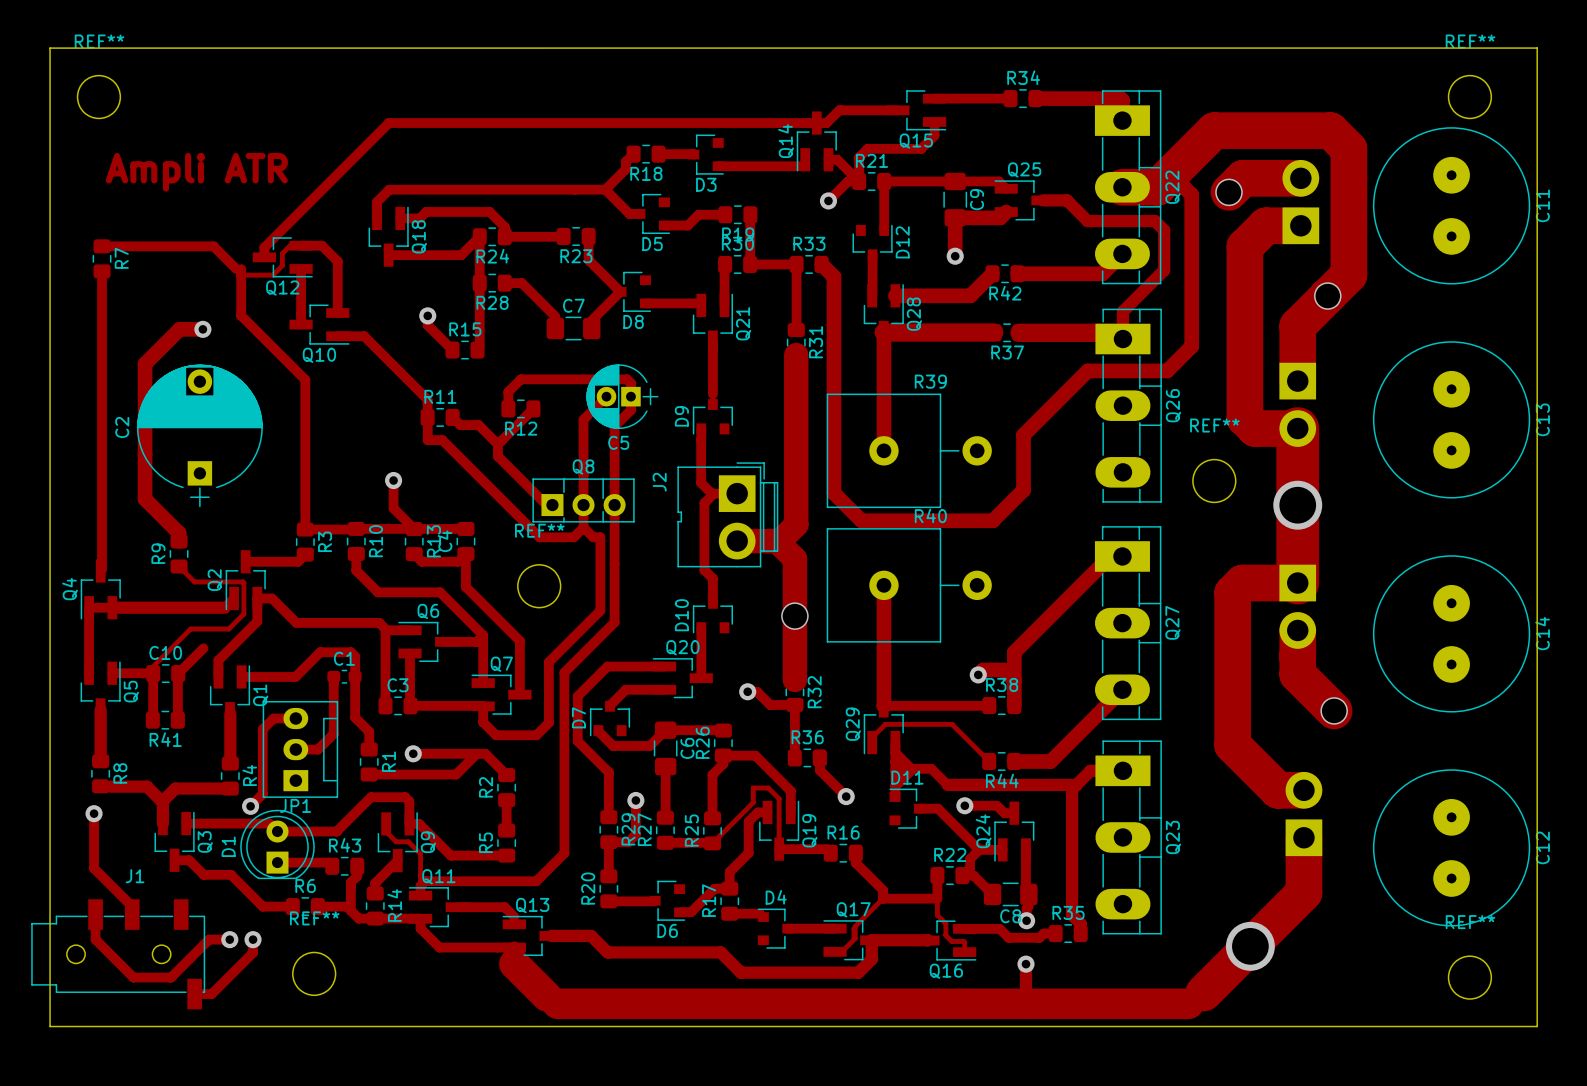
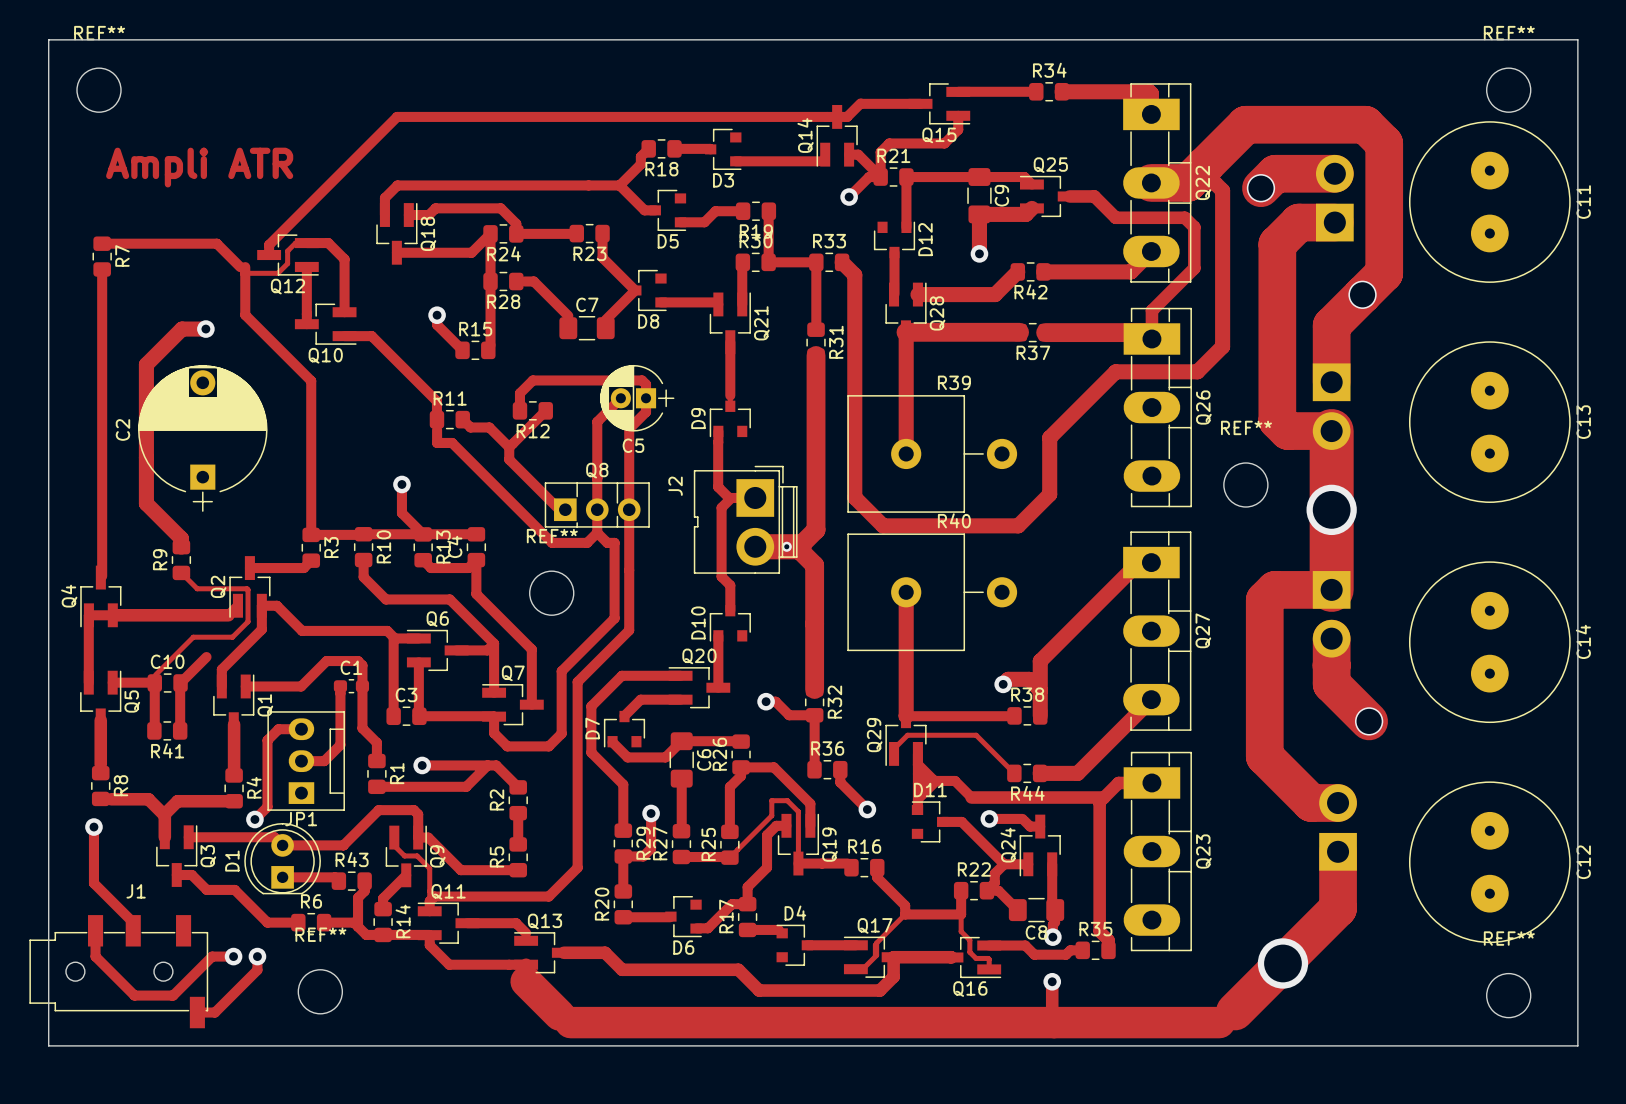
track width: thick (796, 355) (796, 524) (781, 539) (781, 545) (794, 559) (794, 679) -> thin (816, 355) (816, 529) (801, 544) (801, 551) (814, 565) (814, 689)
via: none -> (786, 546)
via: (794, 616) -> none

